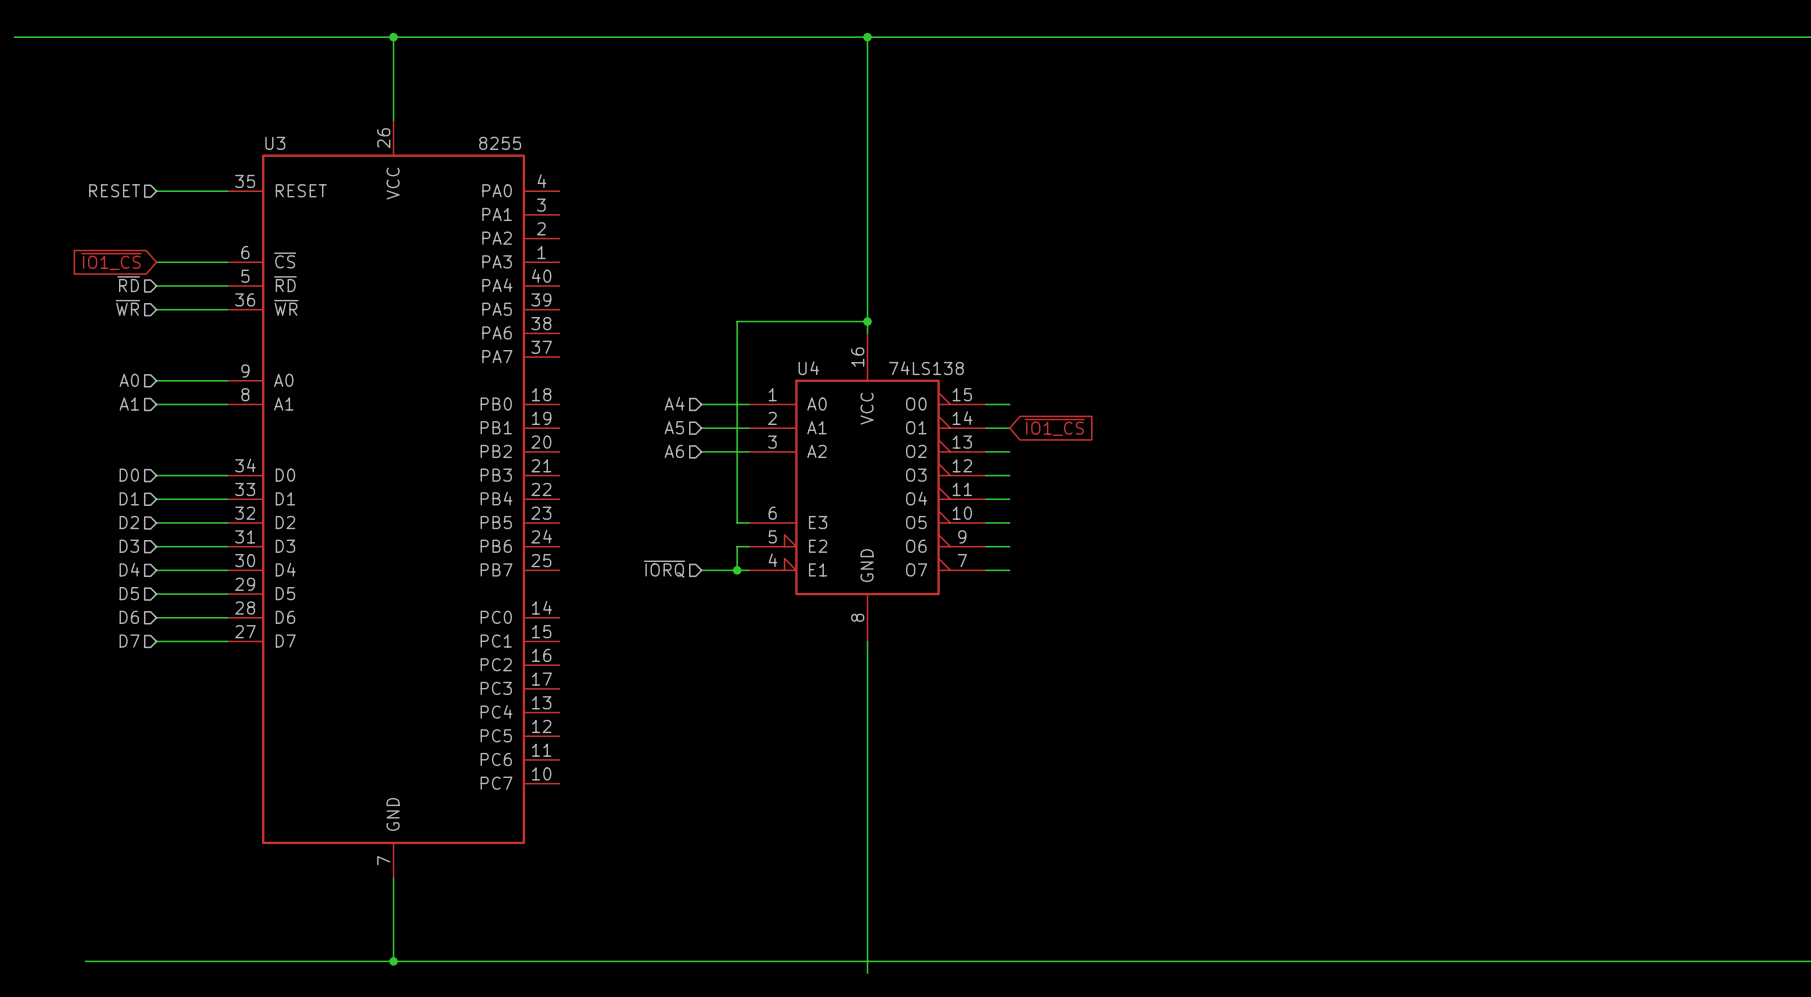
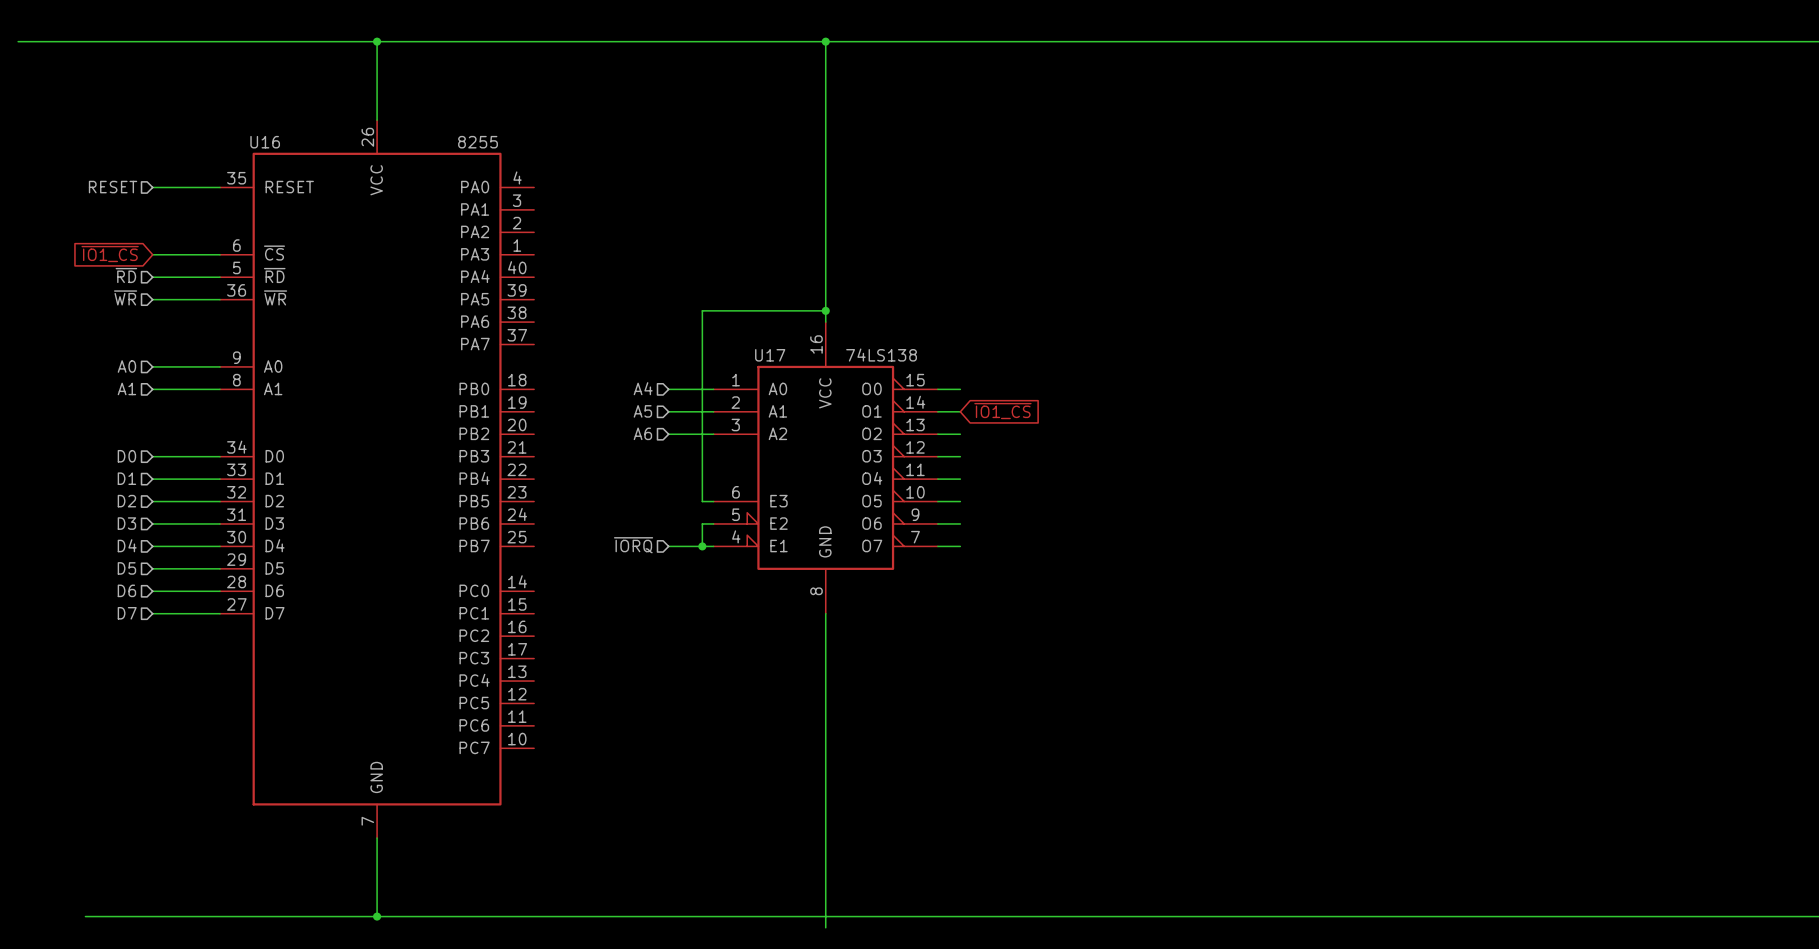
U3 name: U3 (275, 143) -> U16 (265, 142)
U4 name: U4 (808, 368) -> U17 (770, 355)

